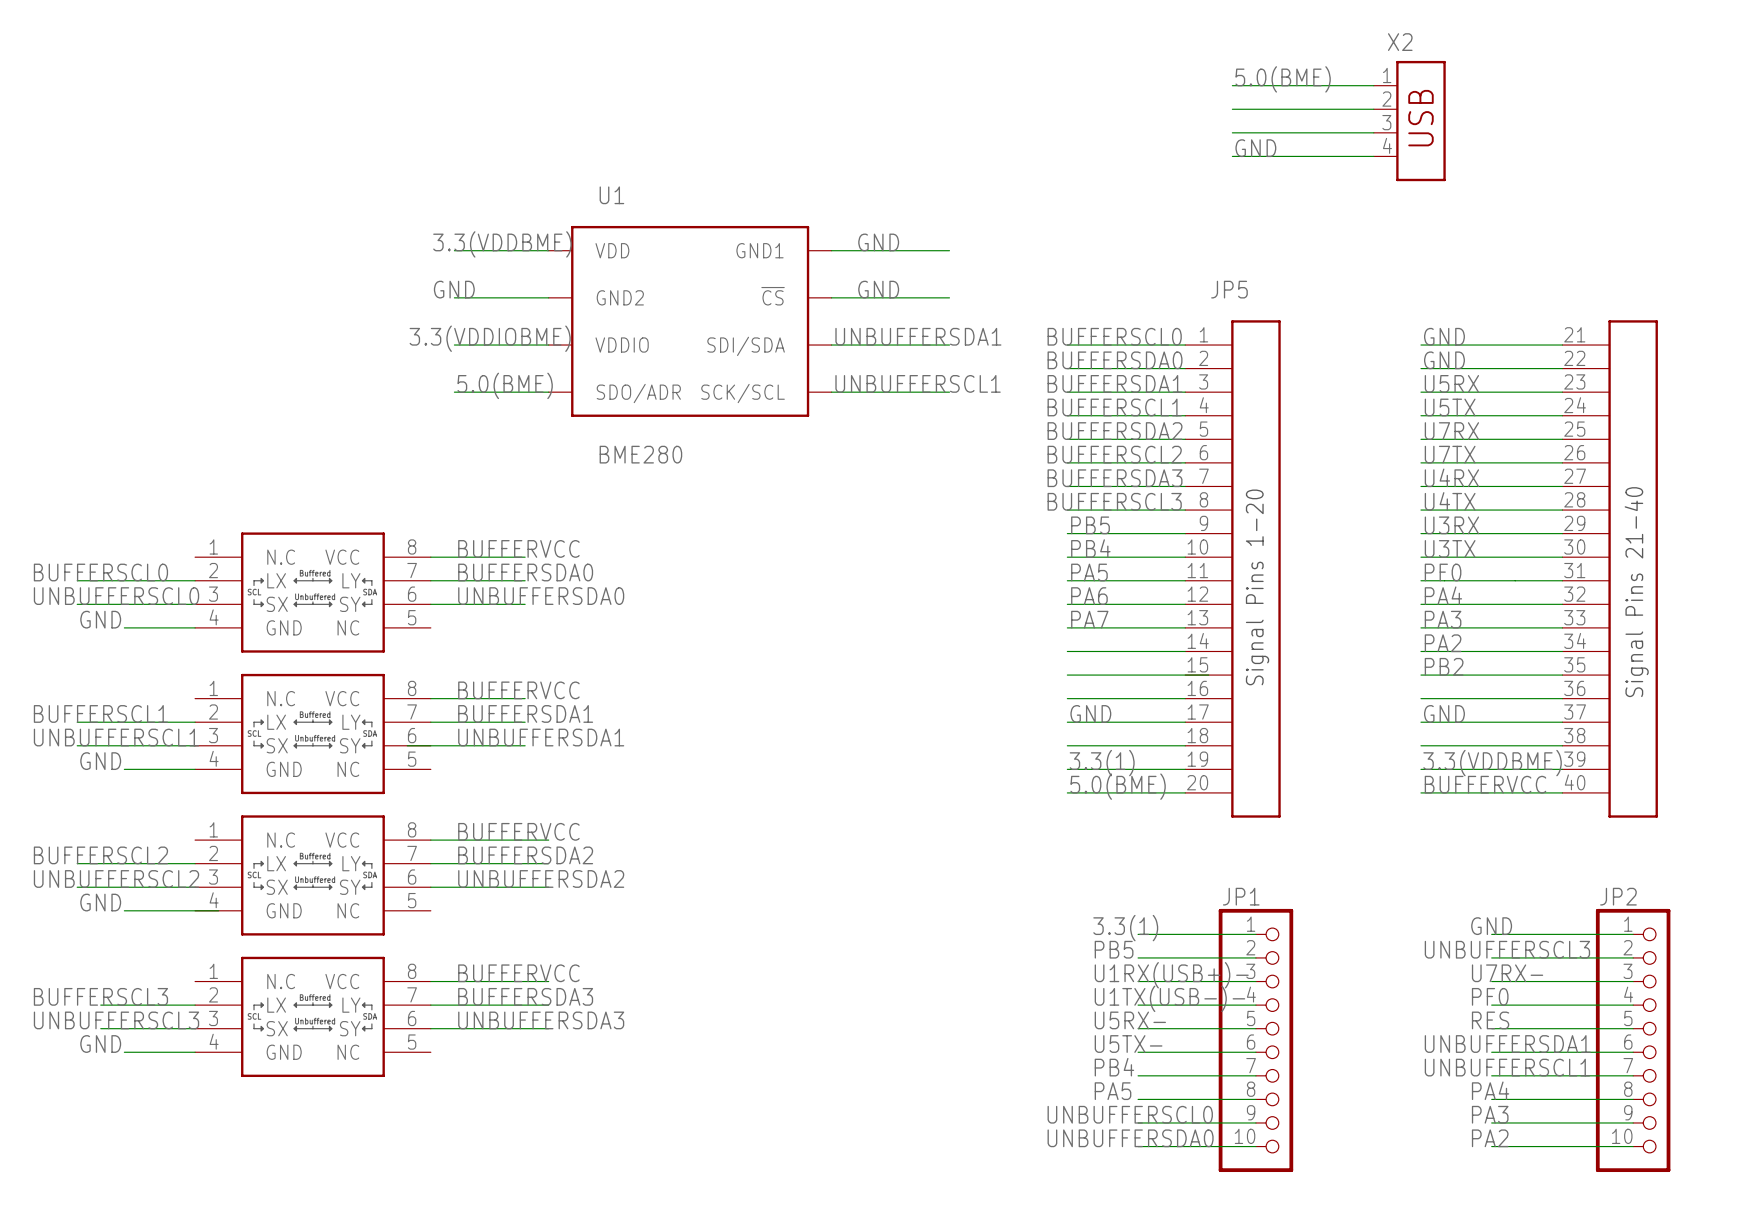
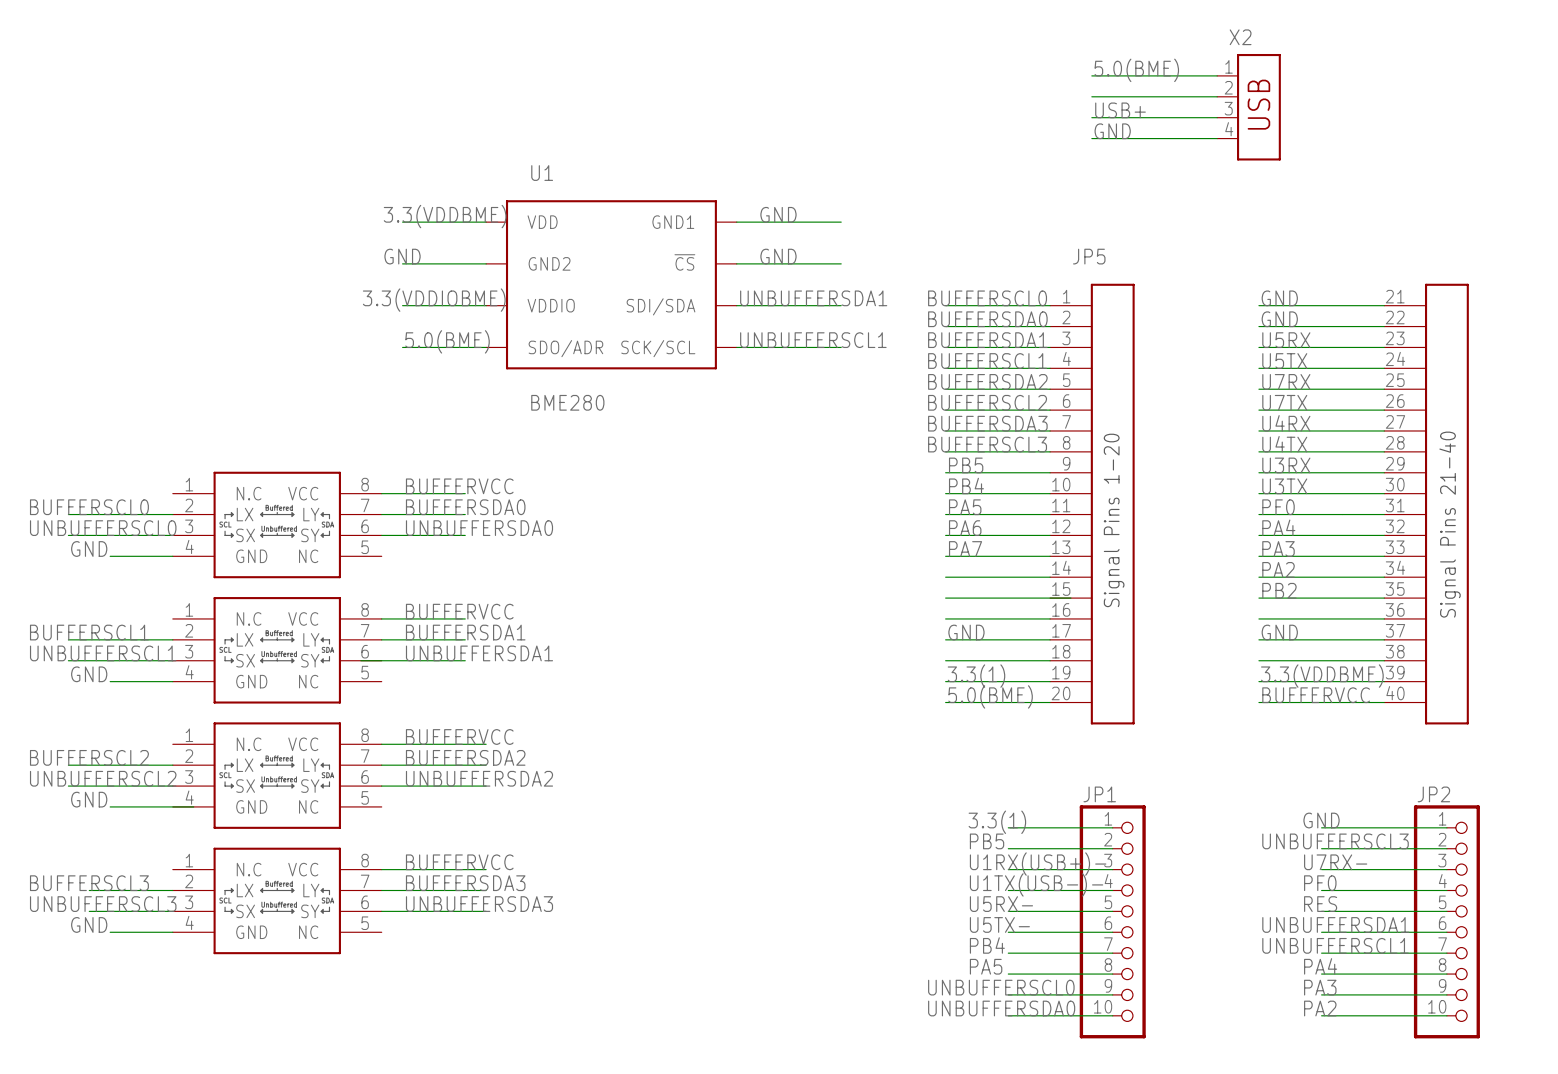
label: none -> USB+ (1120, 110)

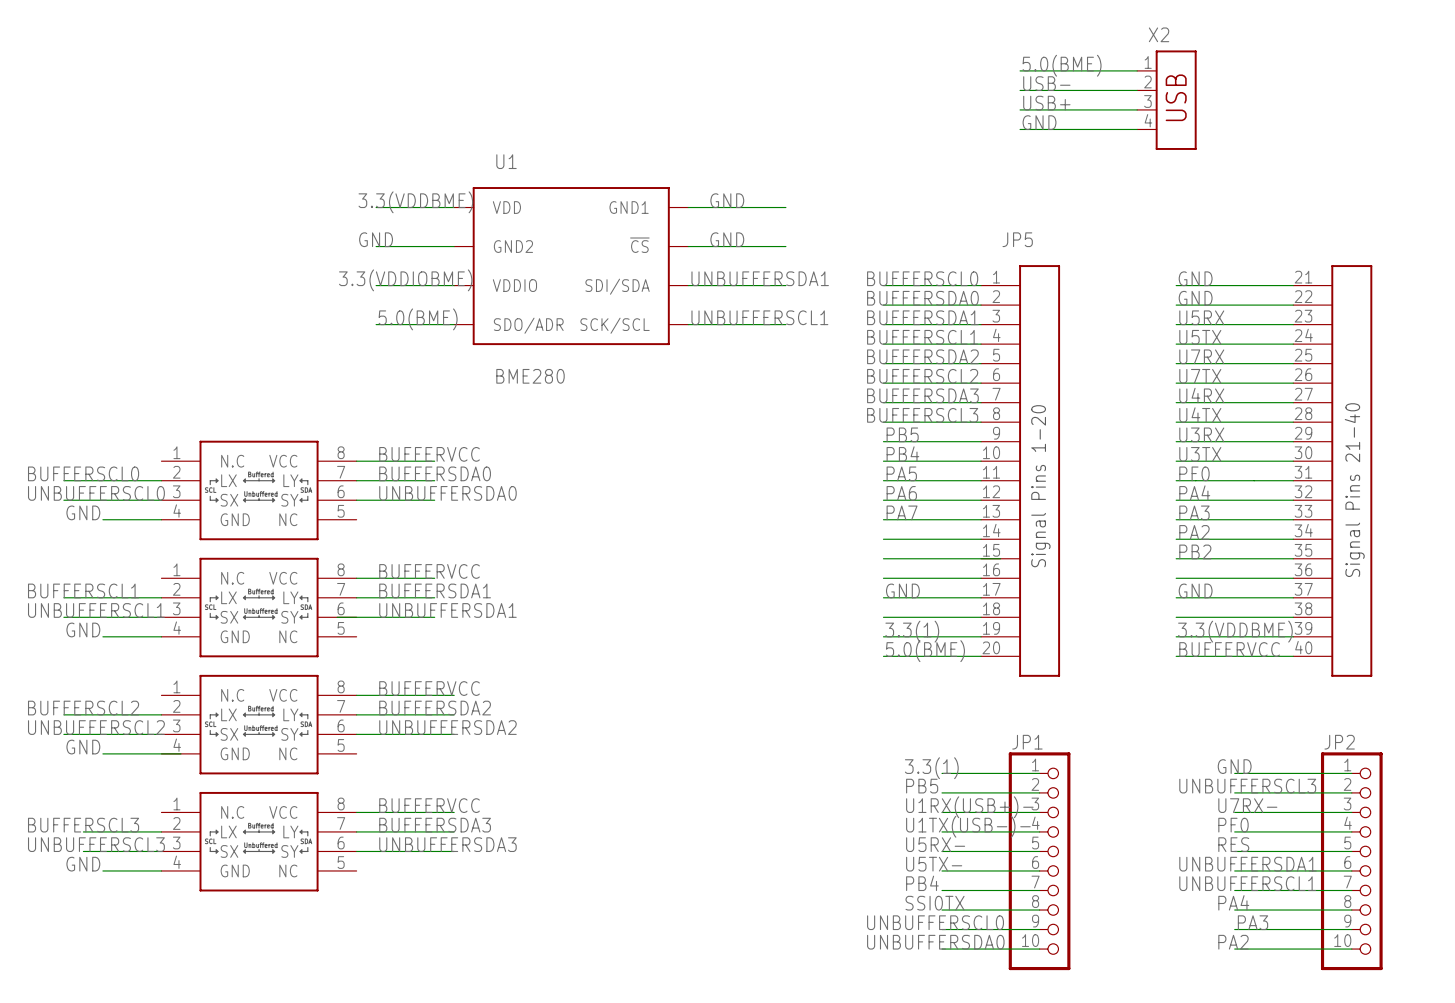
label: none -> USB- (1046, 83)
label: PA5 (986, 966) -> SSI0TX (935, 903)
label position: PA3 (1320, 987) -> PA3 (1253, 922)

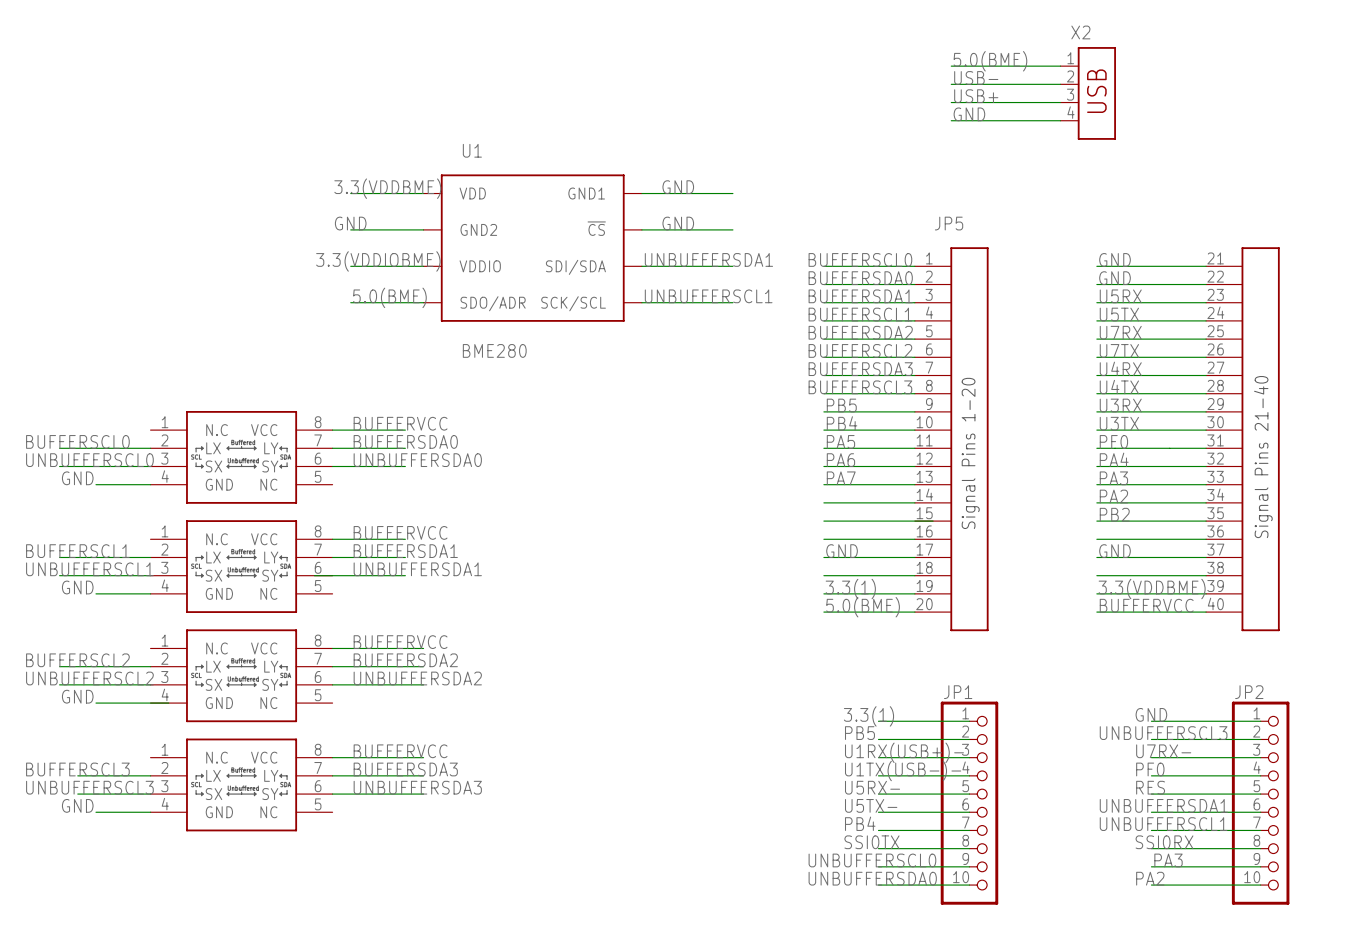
label: PA4 (1233, 902) -> SSI0RX (1164, 842)

